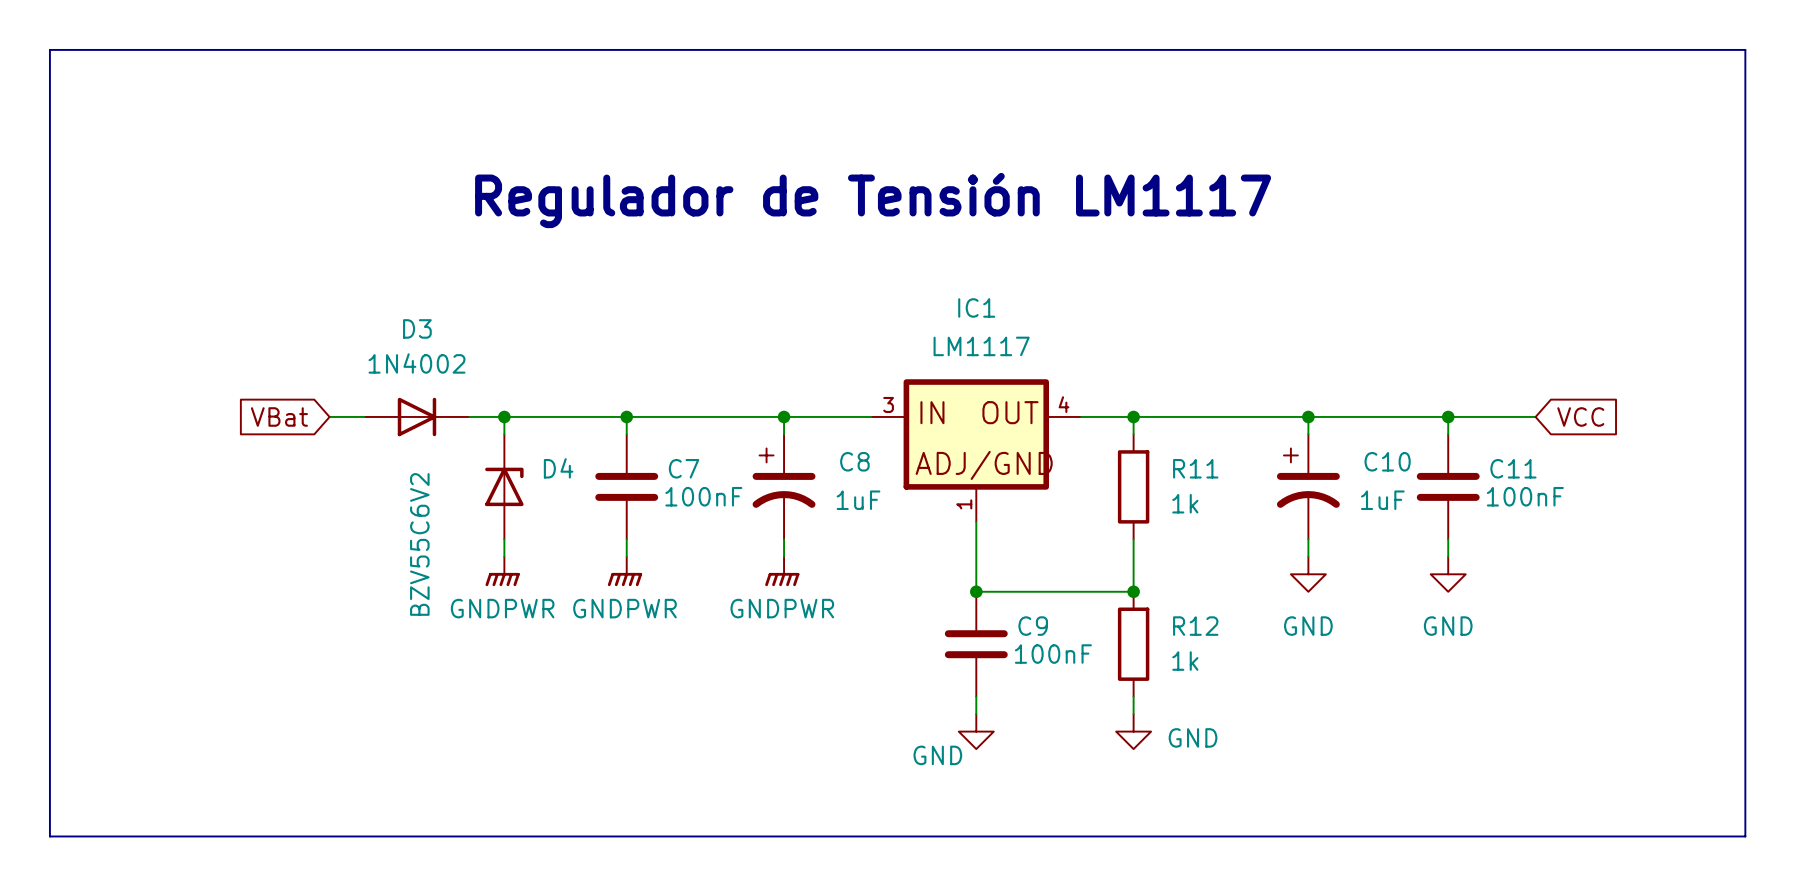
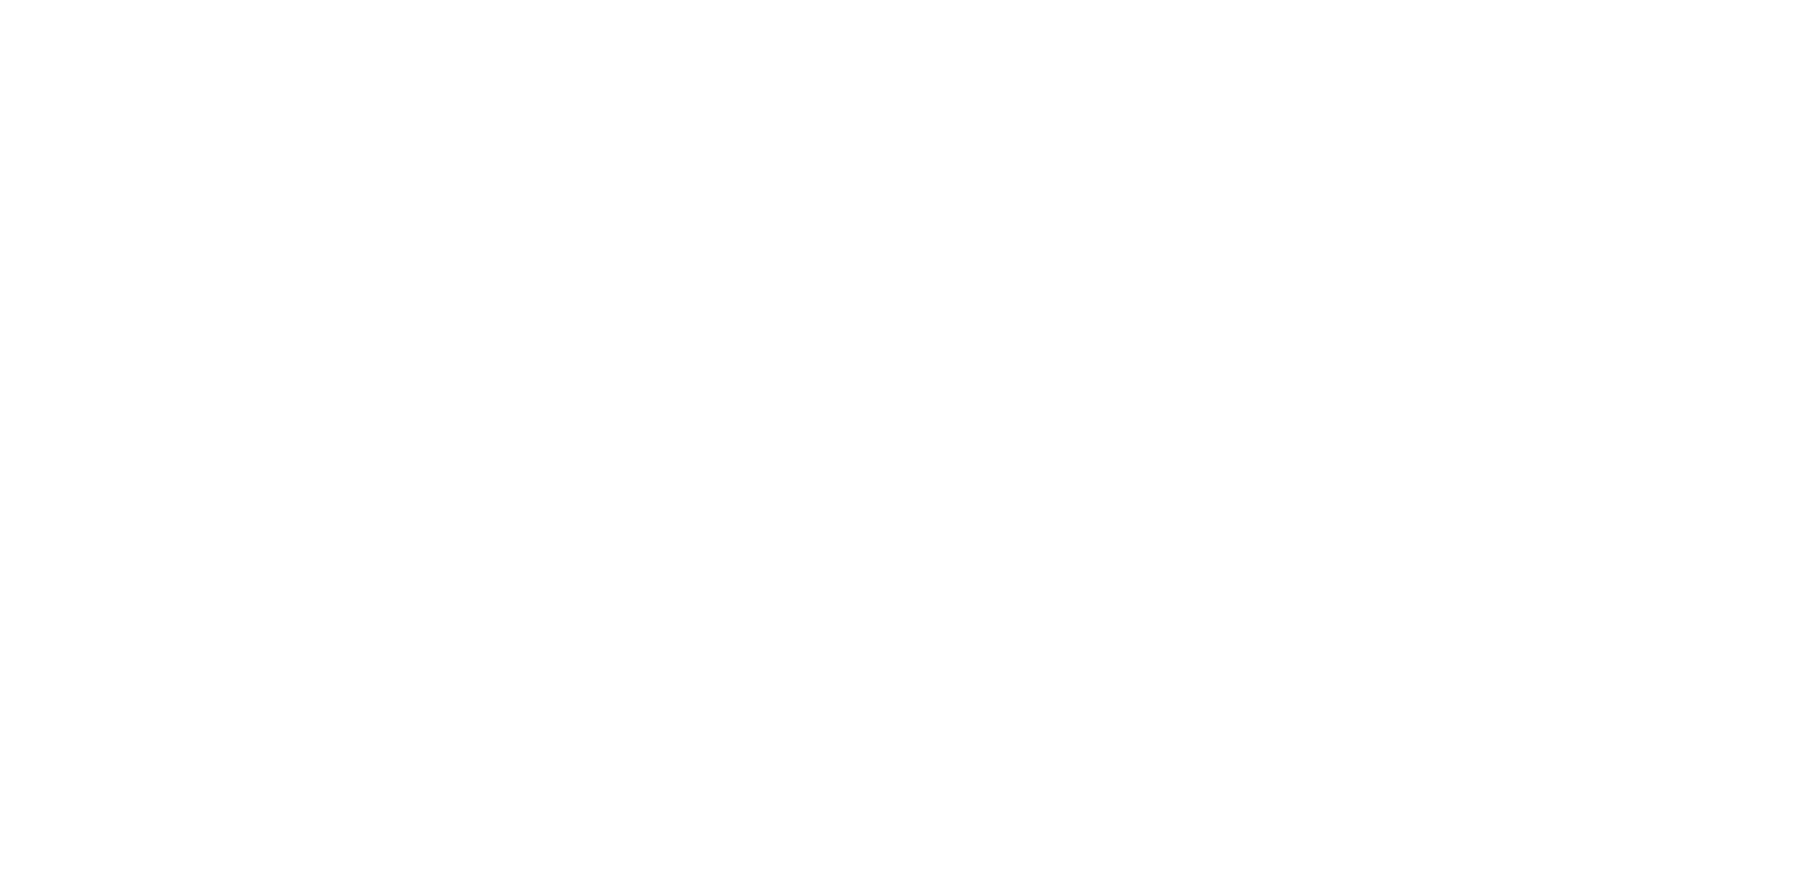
line: (49, 49) (1745, 49) (1745, 836) (49, 836) (49, 49) -> none
text: Regulador de Tensión LM1117 (873, 200) -> none
global label: VBat (279, 416) -> none
wire: (329, 416) (364, 416) -> none
D3: 1N4002 (416, 416) -> none
wire: (469, 416) (871, 416) -> none
wire: (504, 416) (504, 434) -> none
junction: (504, 416) -> none
wire: (626, 416) (626, 434) -> none
junction: (626, 416) -> none
wire: (784, 416) (784, 434) -> none
junction: (784, 416) -> none
wire: (1081, 416) (1535, 416) -> none
wire: (1133, 416) (1133, 434) -> none
junction: (1133, 416) -> none
wire: (1308, 416) (1308, 434) -> none
junction: (1308, 416) -> none
wire: (1448, 416) (1448, 434) -> none
junction: (1448, 416) -> none
global label: VCC (1580, 416) -> none
IC1: LM1117 (976, 450) -> none
D4: BZV55C6V2 (504, 486) -> none
C7: 100nF (626, 486) -> none
C8: 1uF (784, 486) -> none
R11: 1k (1133, 486) -> none
C10: 1uF (1308, 486) -> none
C11: 100nF (1448, 486) -> none
wire: (976, 521) (976, 591) (1133, 591) (1133, 539) -> none
wire: (504, 539) (504, 556) -> none
wire: (626, 539) (626, 556) -> none
wire: (784, 539) (784, 556) -> none
wire: (1308, 539) (1308, 556) -> none
wire: (1448, 539) (1448, 556) -> none
power symbol: GNDPWR (502, 571) -> none
power symbol: GNDPWR (624, 571) -> none
power symbol: GNDPWR (782, 571) -> none
power symbol: GND (1308, 574) -> none
power symbol: GND (1448, 574) -> none
junction: (976, 591) -> none
junction: (1133, 591) -> none
C9: 100nF (976, 644) -> none
R12: 1k (1133, 644) -> none
wire: (976, 696) (976, 714) -> none
wire: (1133, 696) (1133, 714) -> none
power symbol: GND (976, 731) -> none
power symbol: GND (1133, 731) -> none

